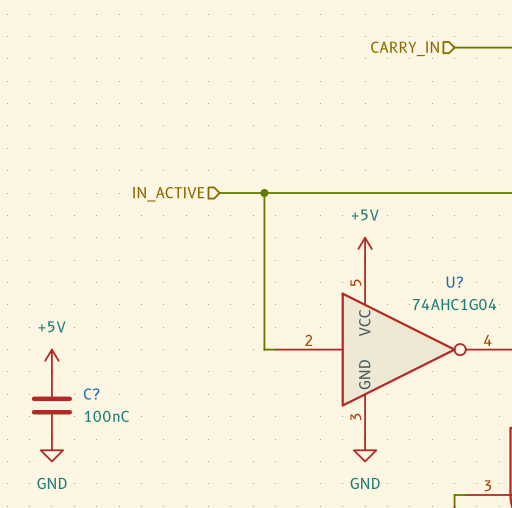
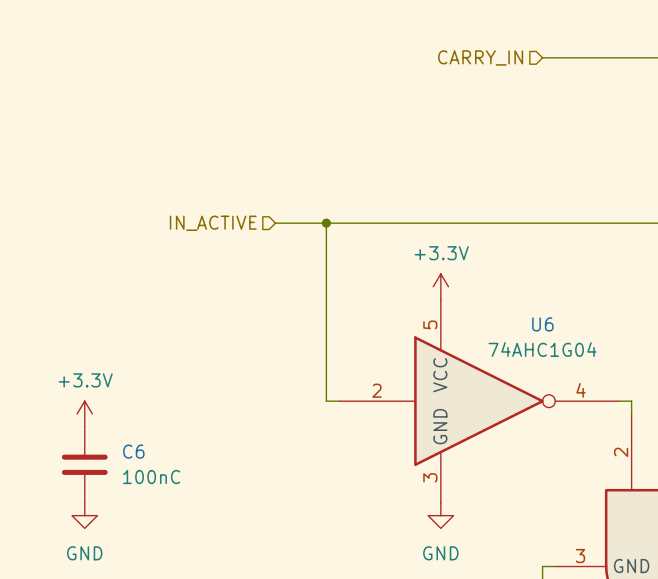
power symbol: +5V (365, 248) -> +3.3V (440, 286)
U? name: U? (454, 282) -> U6 (542, 324)
power symbol: +5V (51, 360) -> +3.3V (84, 413)
C? name: C? (91, 394) -> C6 (133, 451)

